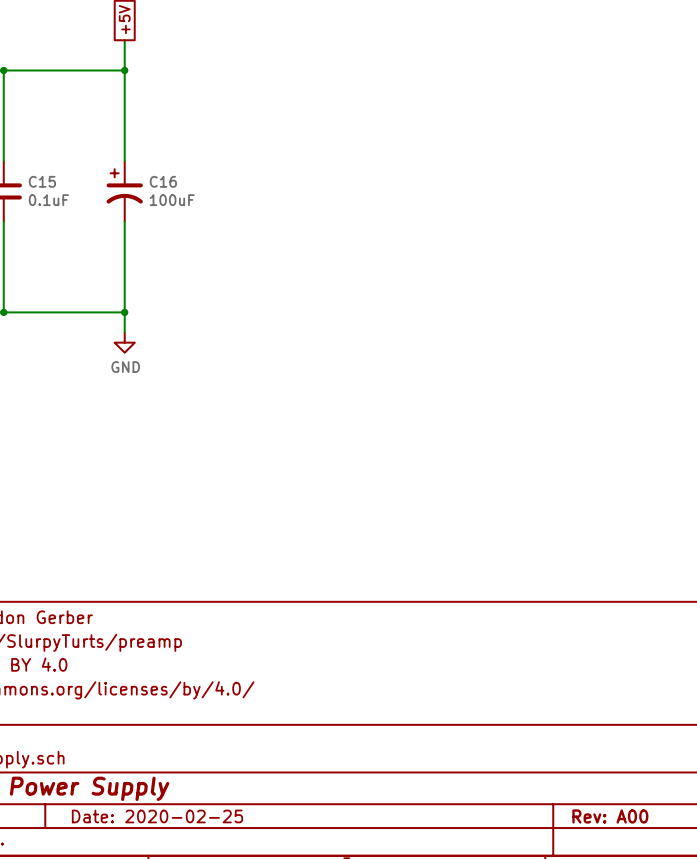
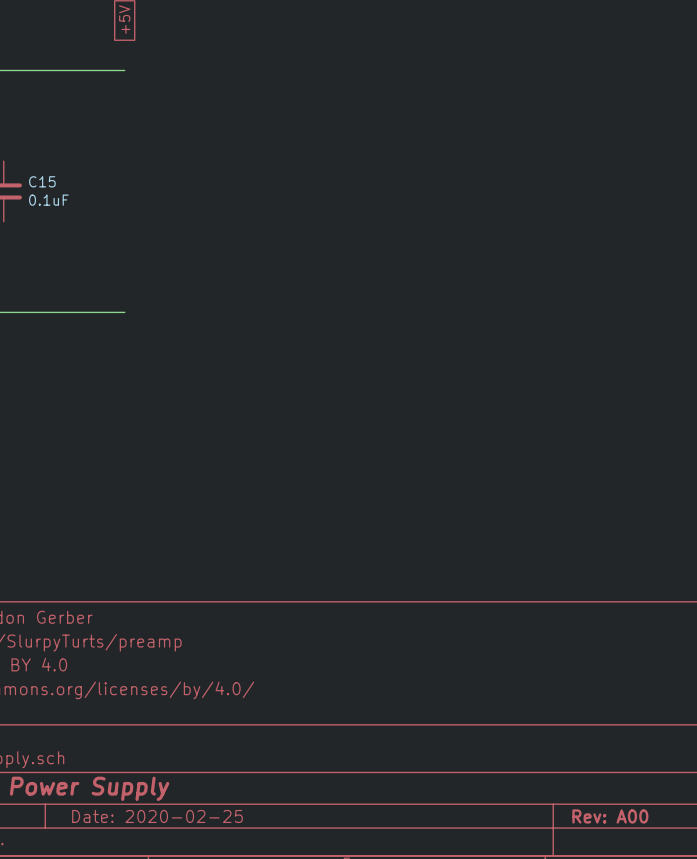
wire: (124, 40) (124, 161) -> none
wire: (3, 70) (3, 161) -> none
junction: (3, 70) -> none
junction: (124, 70) -> none
C16: 100uF (124, 191) -> none
wire: (3, 221) (3, 312) -> none
wire: (124, 221) (124, 332) -> none
junction: (3, 312) -> none
junction: (124, 312) -> none
power symbol: GND (124, 342) -> none

